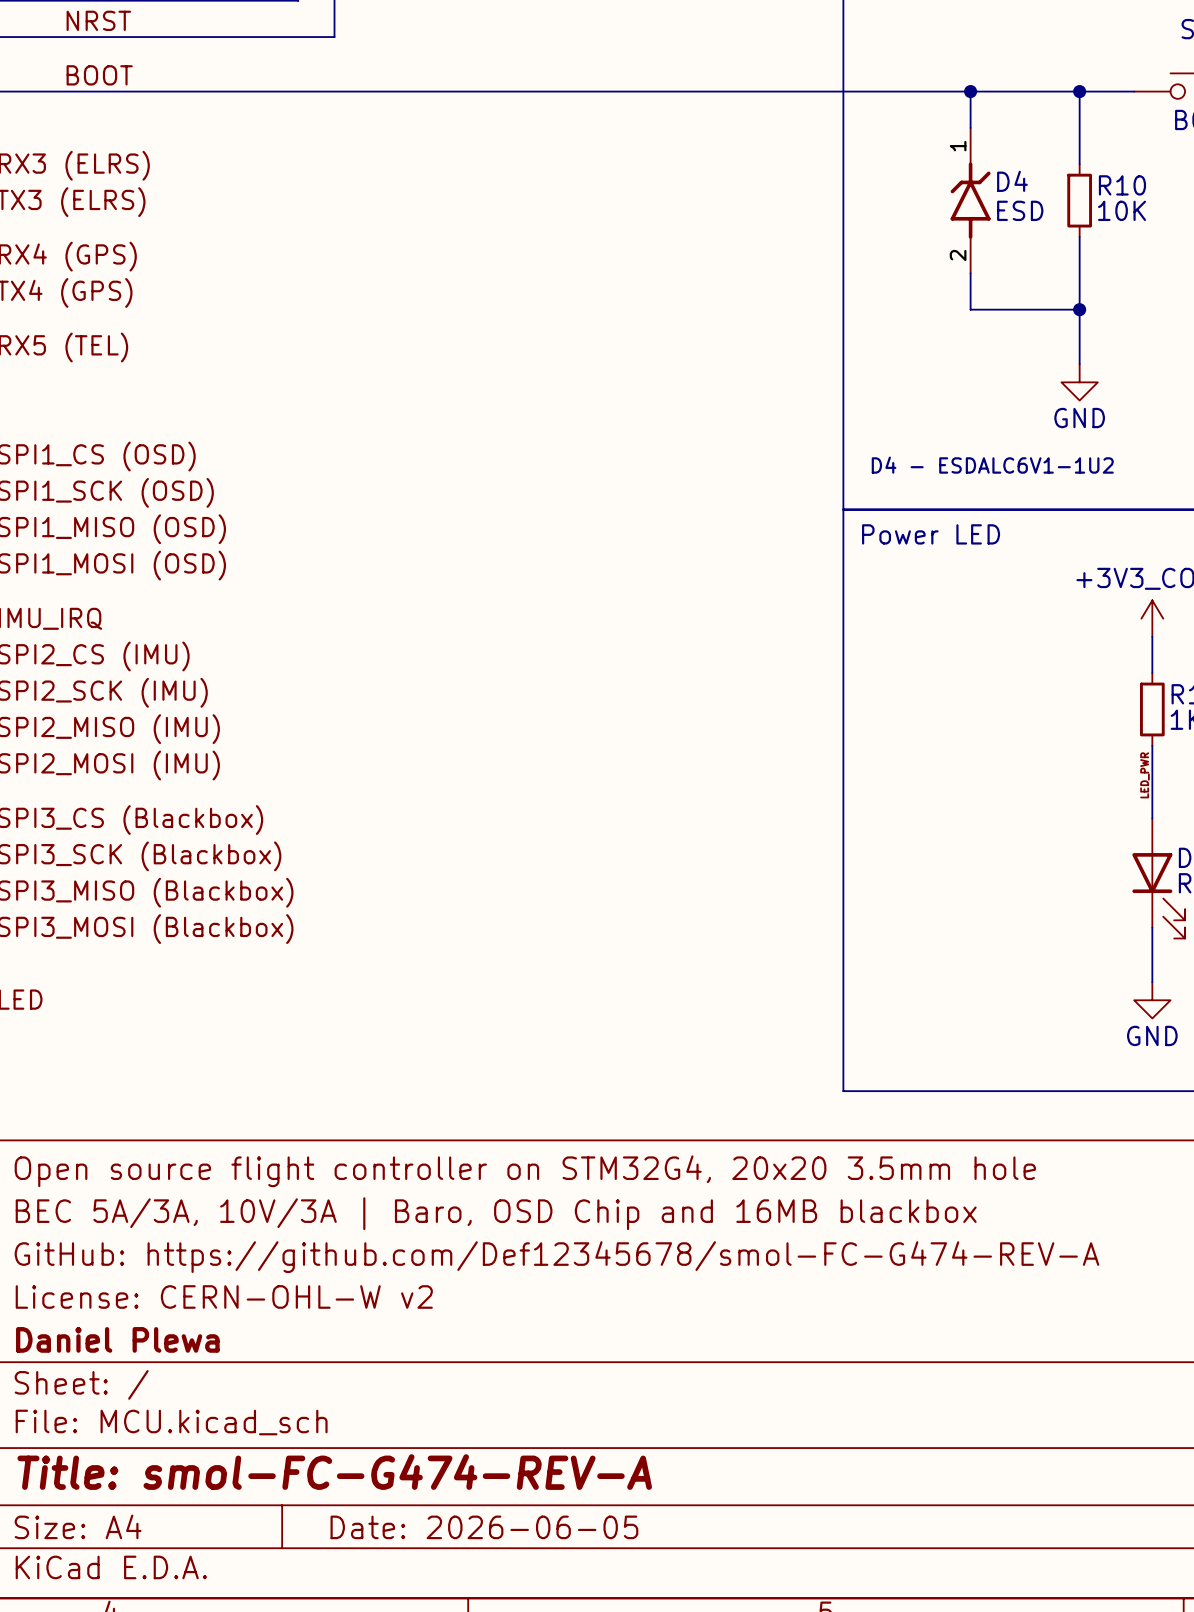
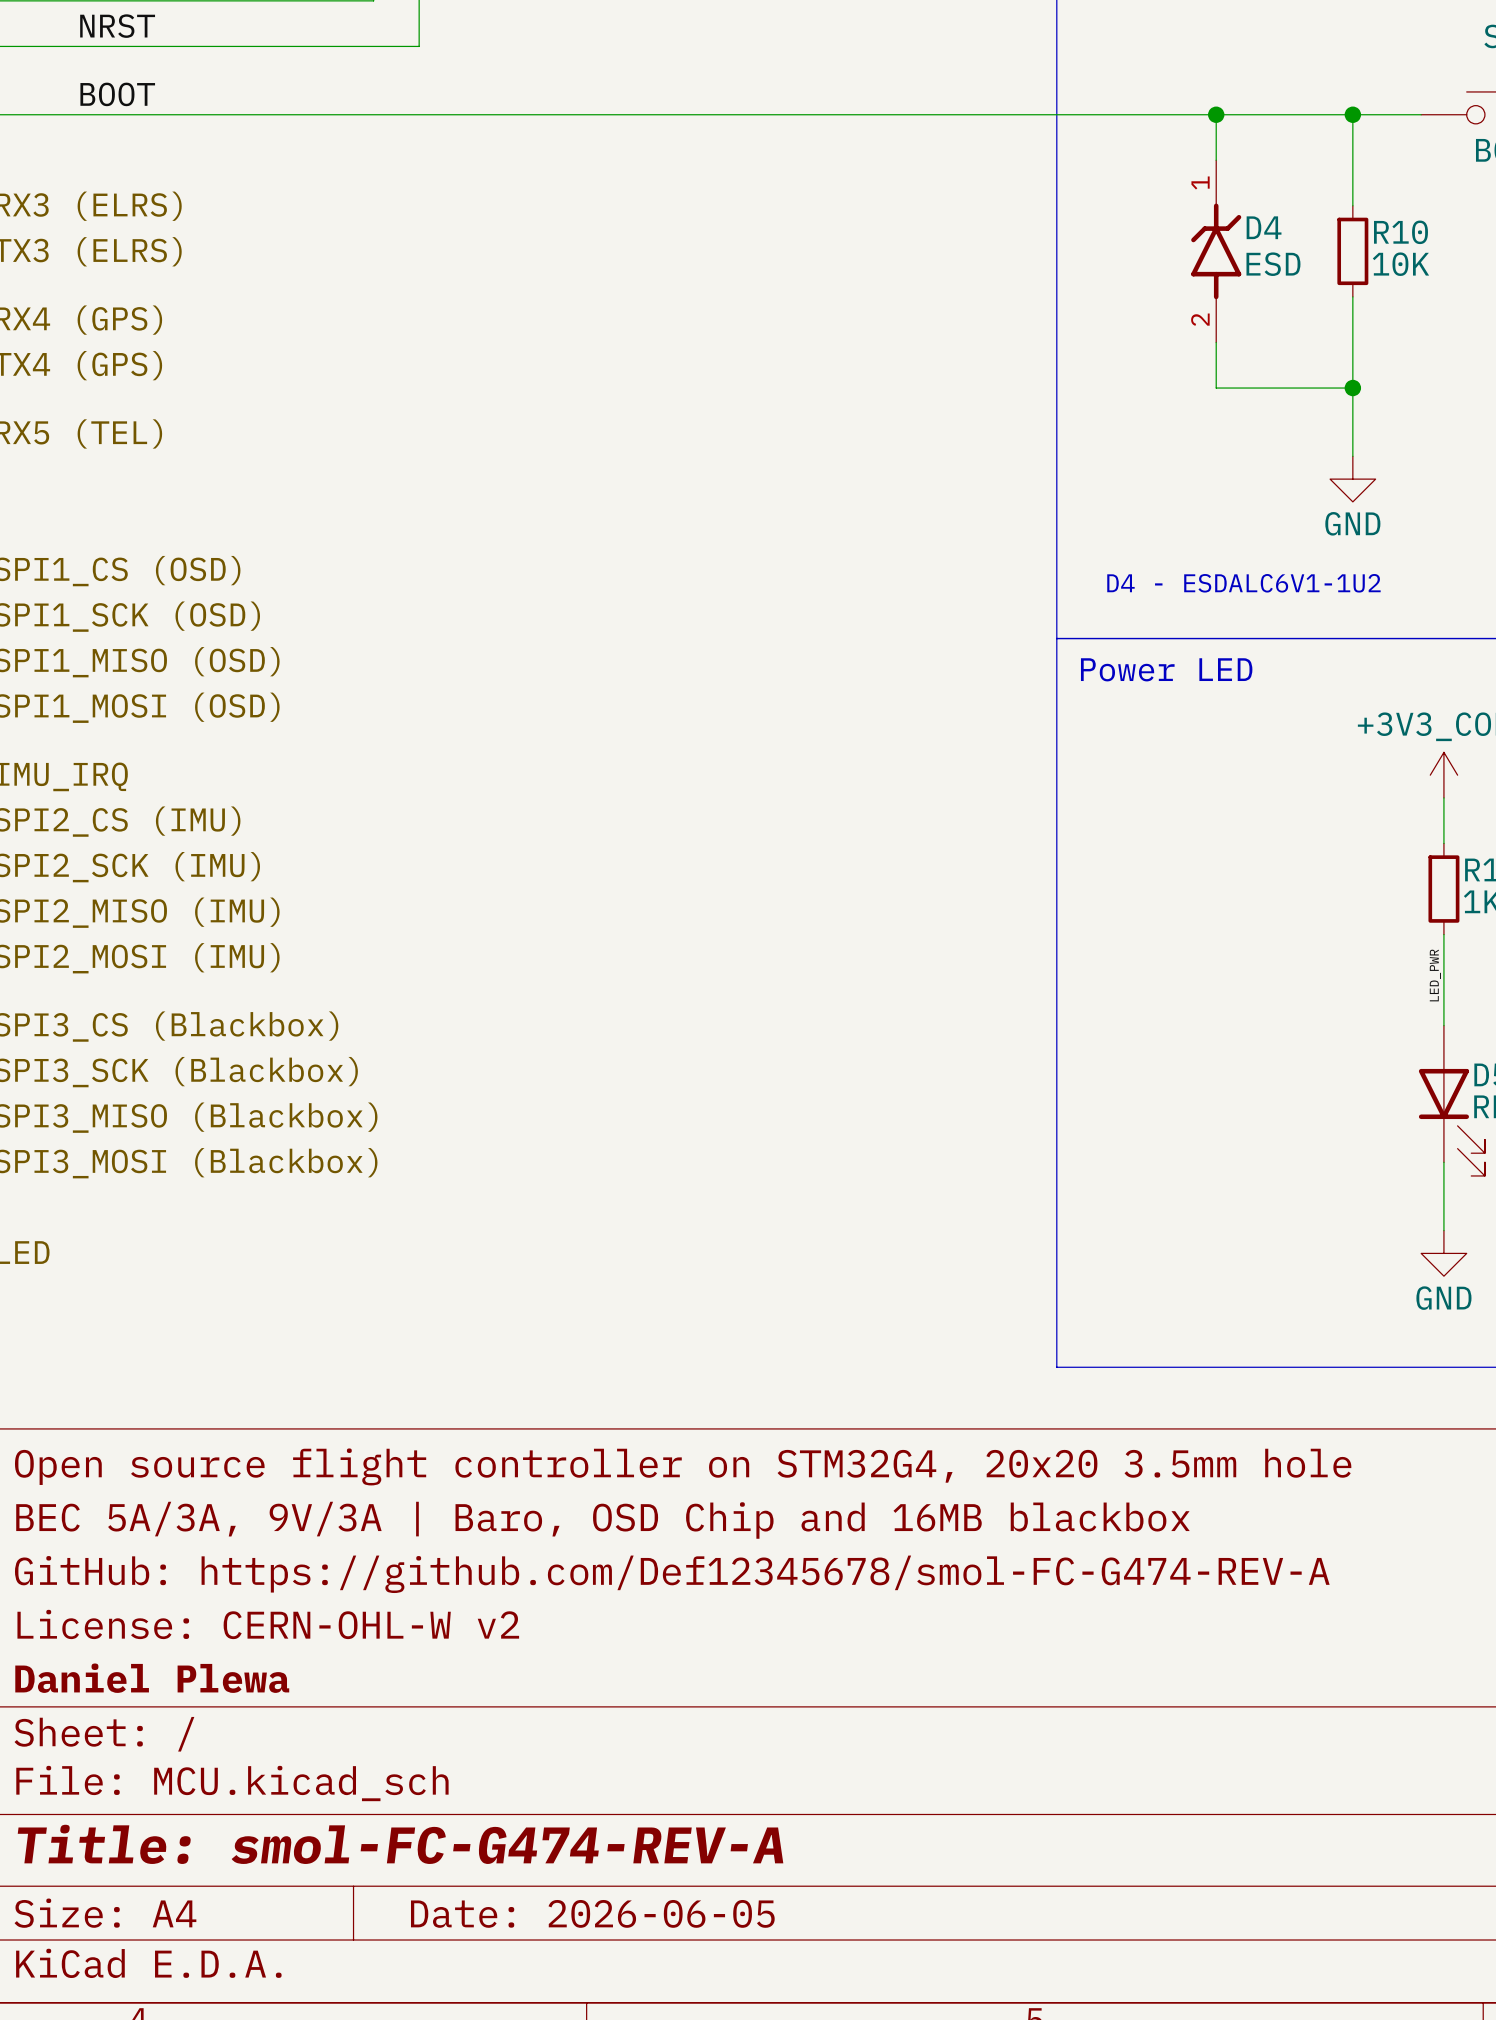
title block: BEC 5A/3A, 10V/3A | Baro, OSD Chip and 16MB blackbox (496, 1213) -> BEC 5A/3A, 9V/3A | Baro, OSD Chip and 16MB blackbox (602, 1520)

